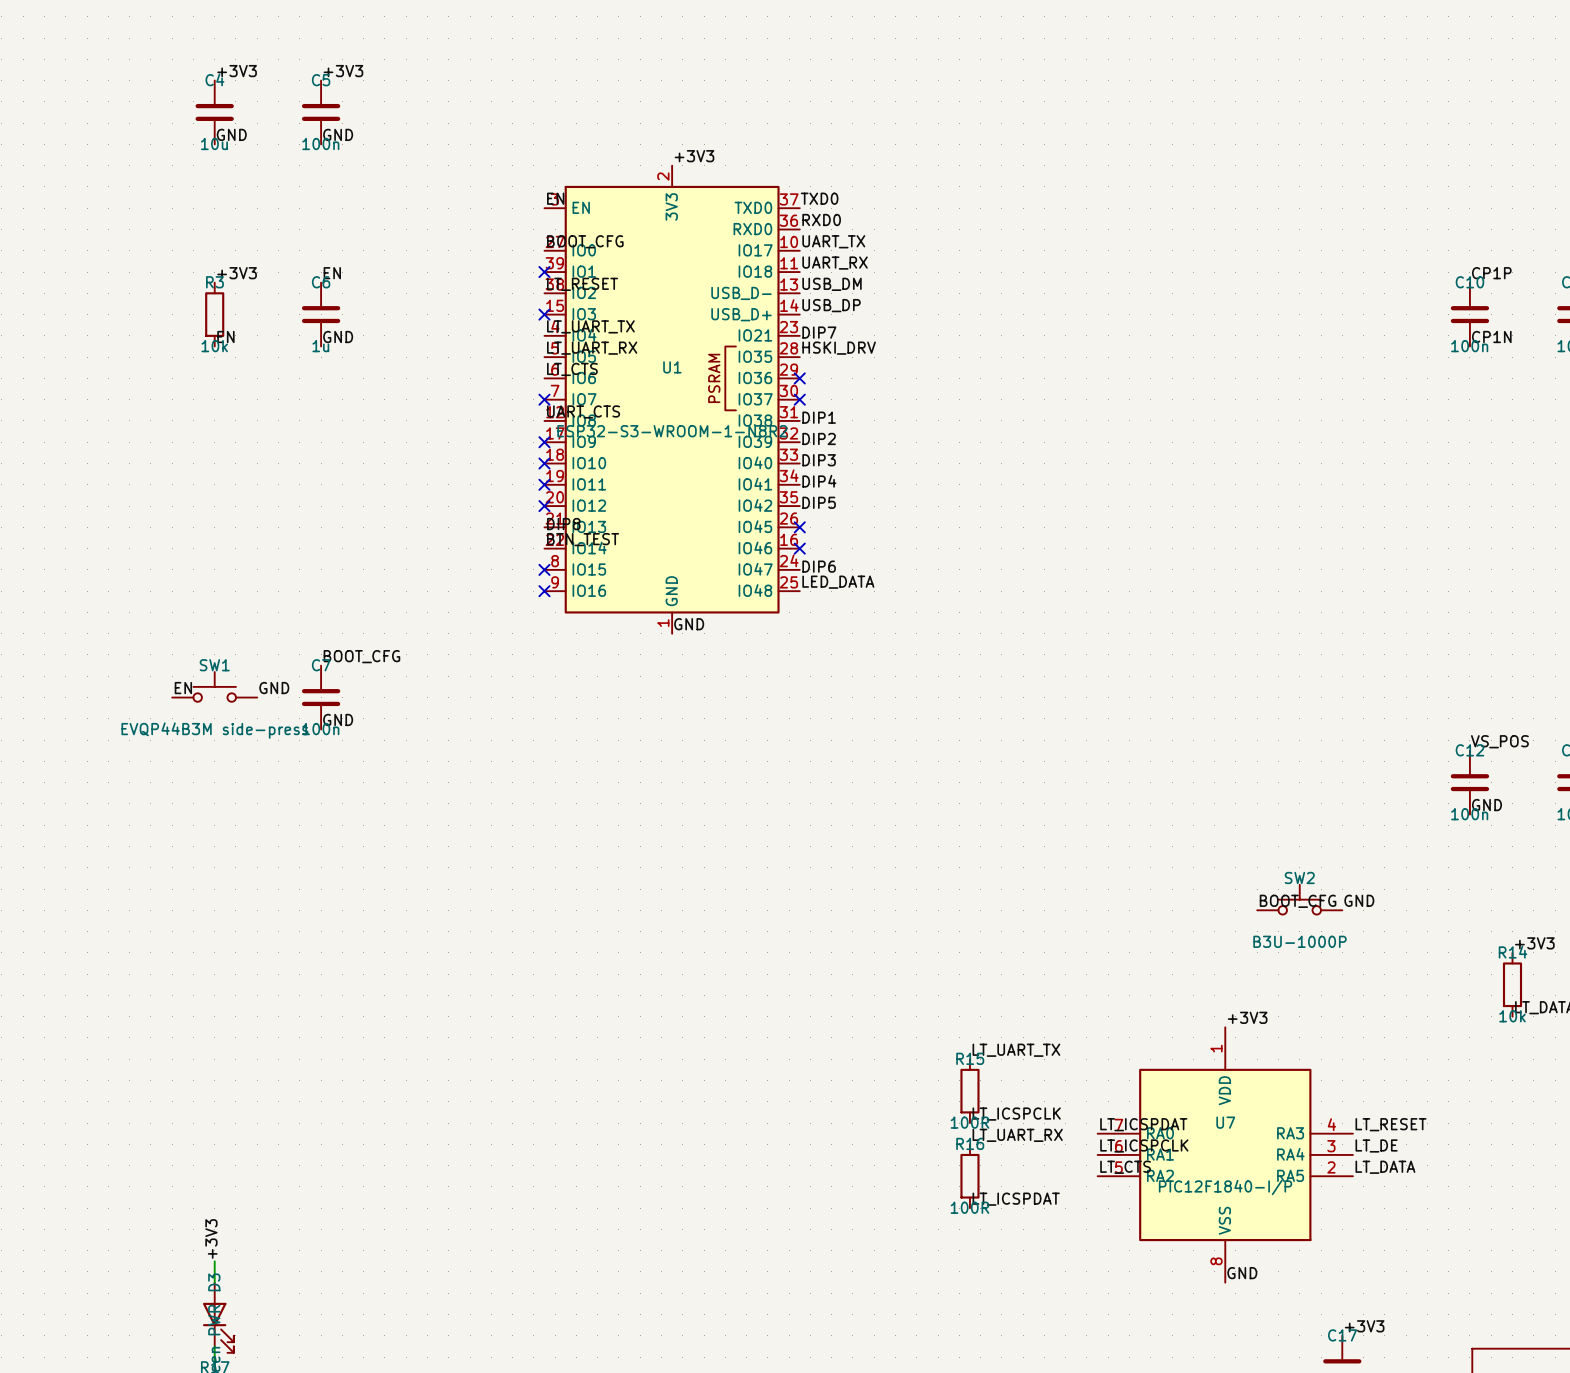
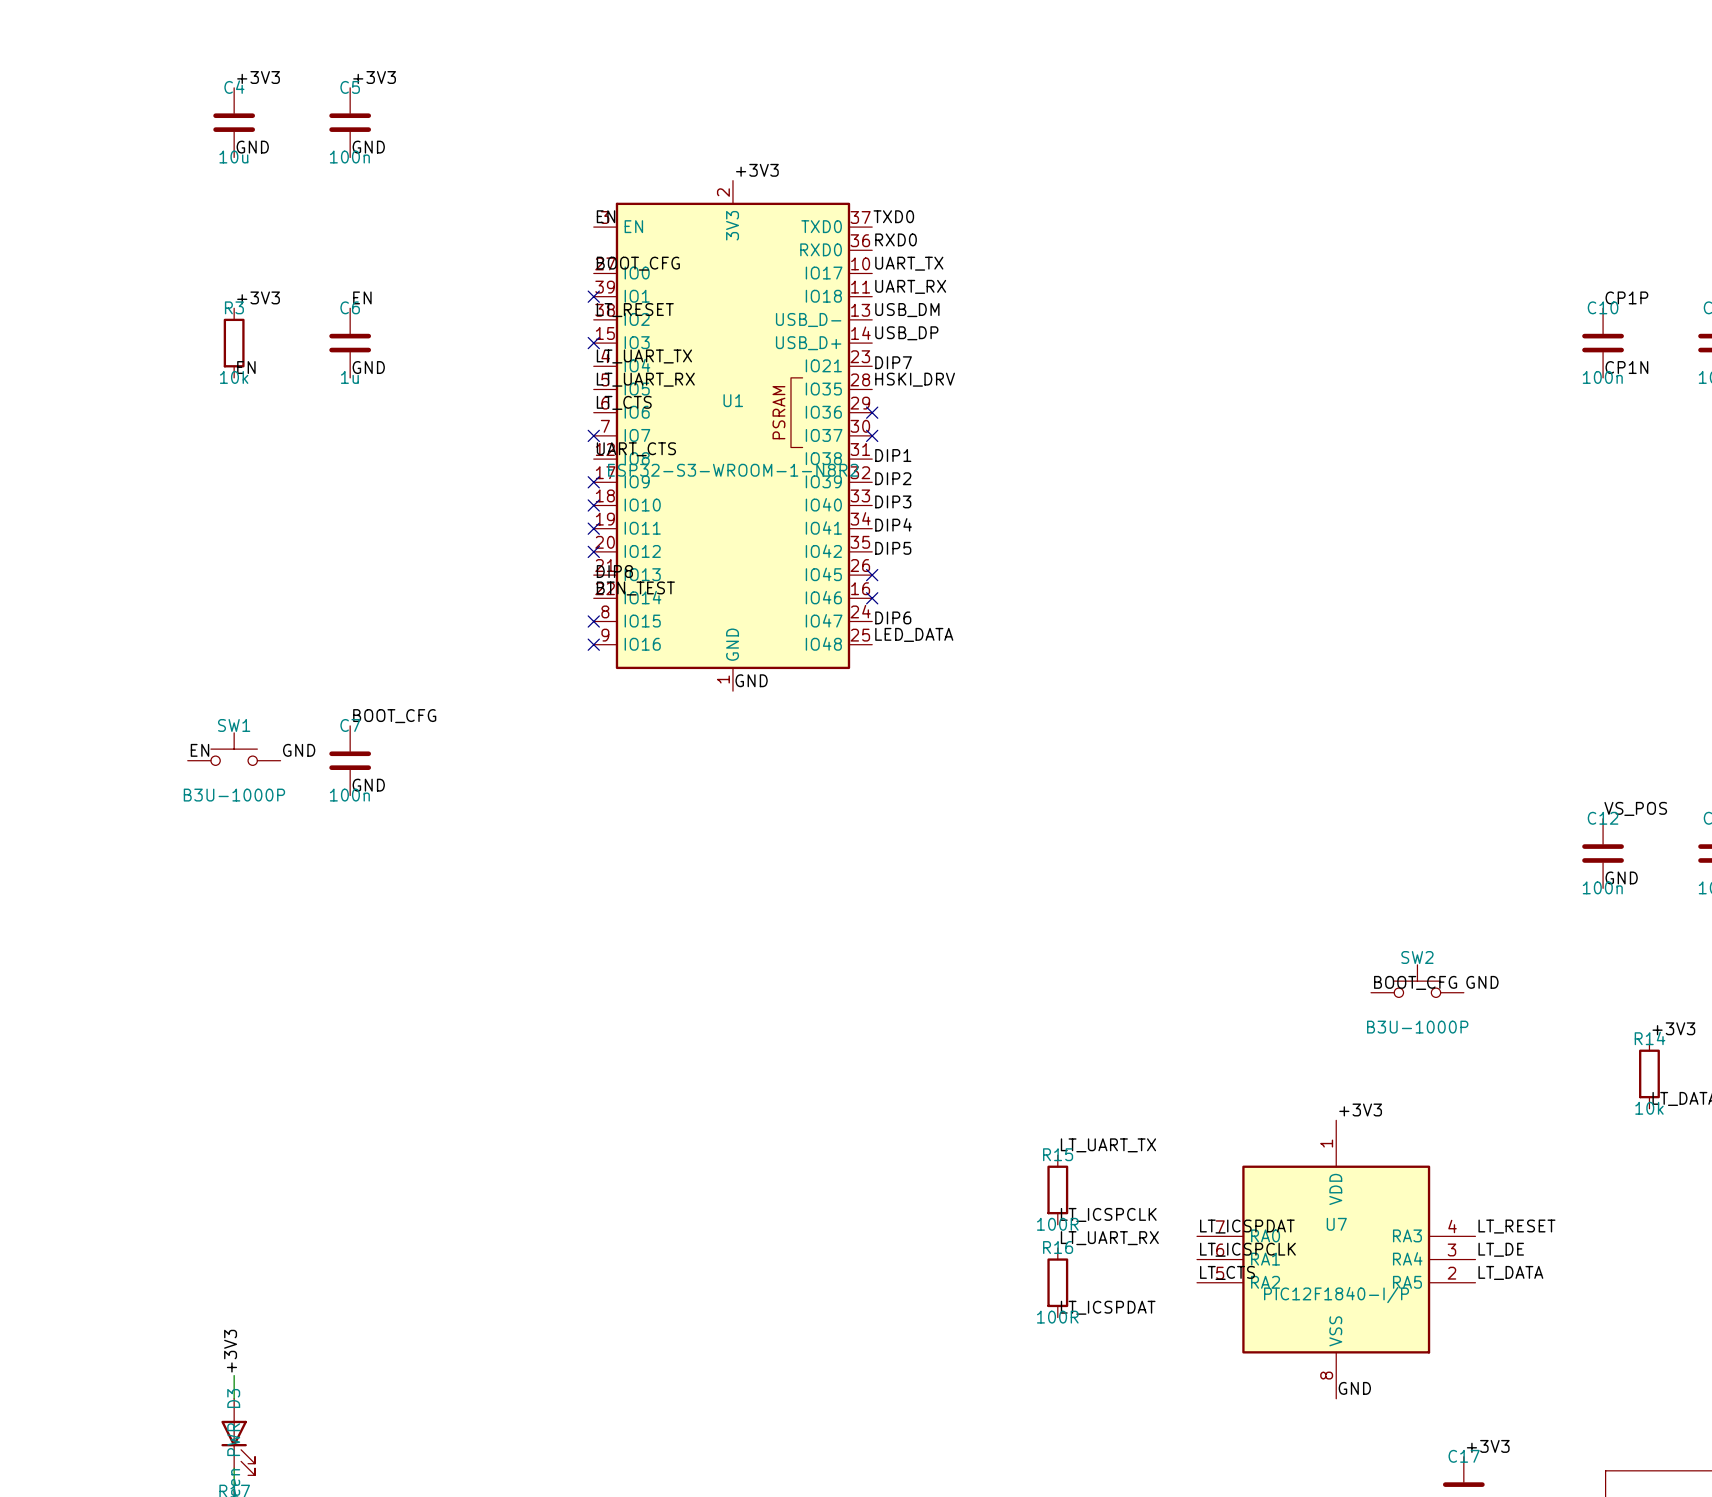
SW1 value: EVQP44B3M side-press (214, 730) -> B3U-1000P (234, 795)

